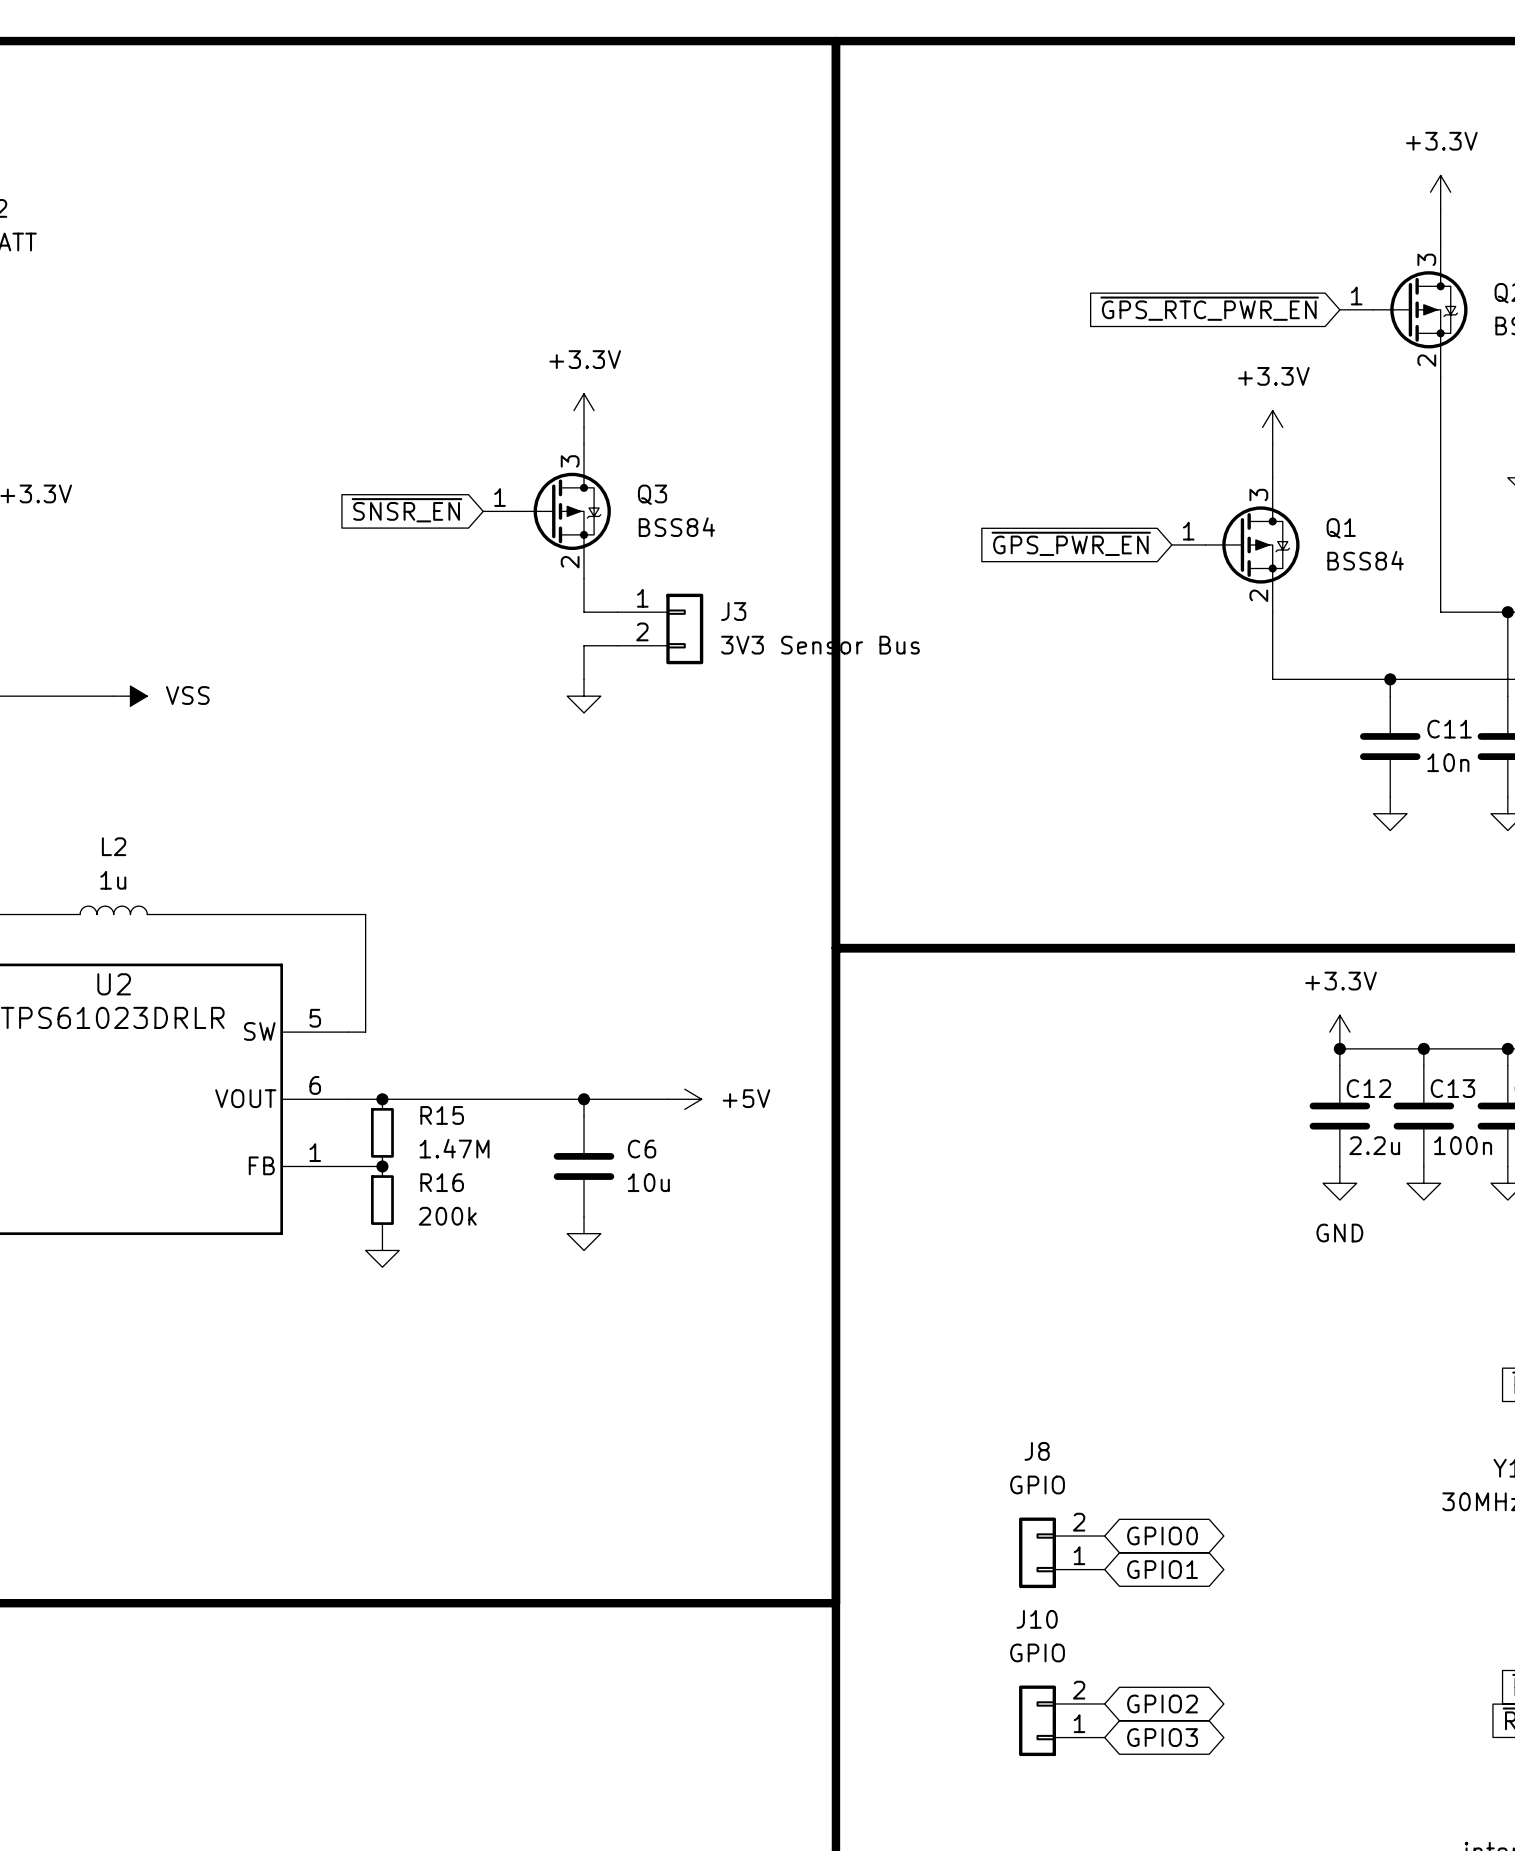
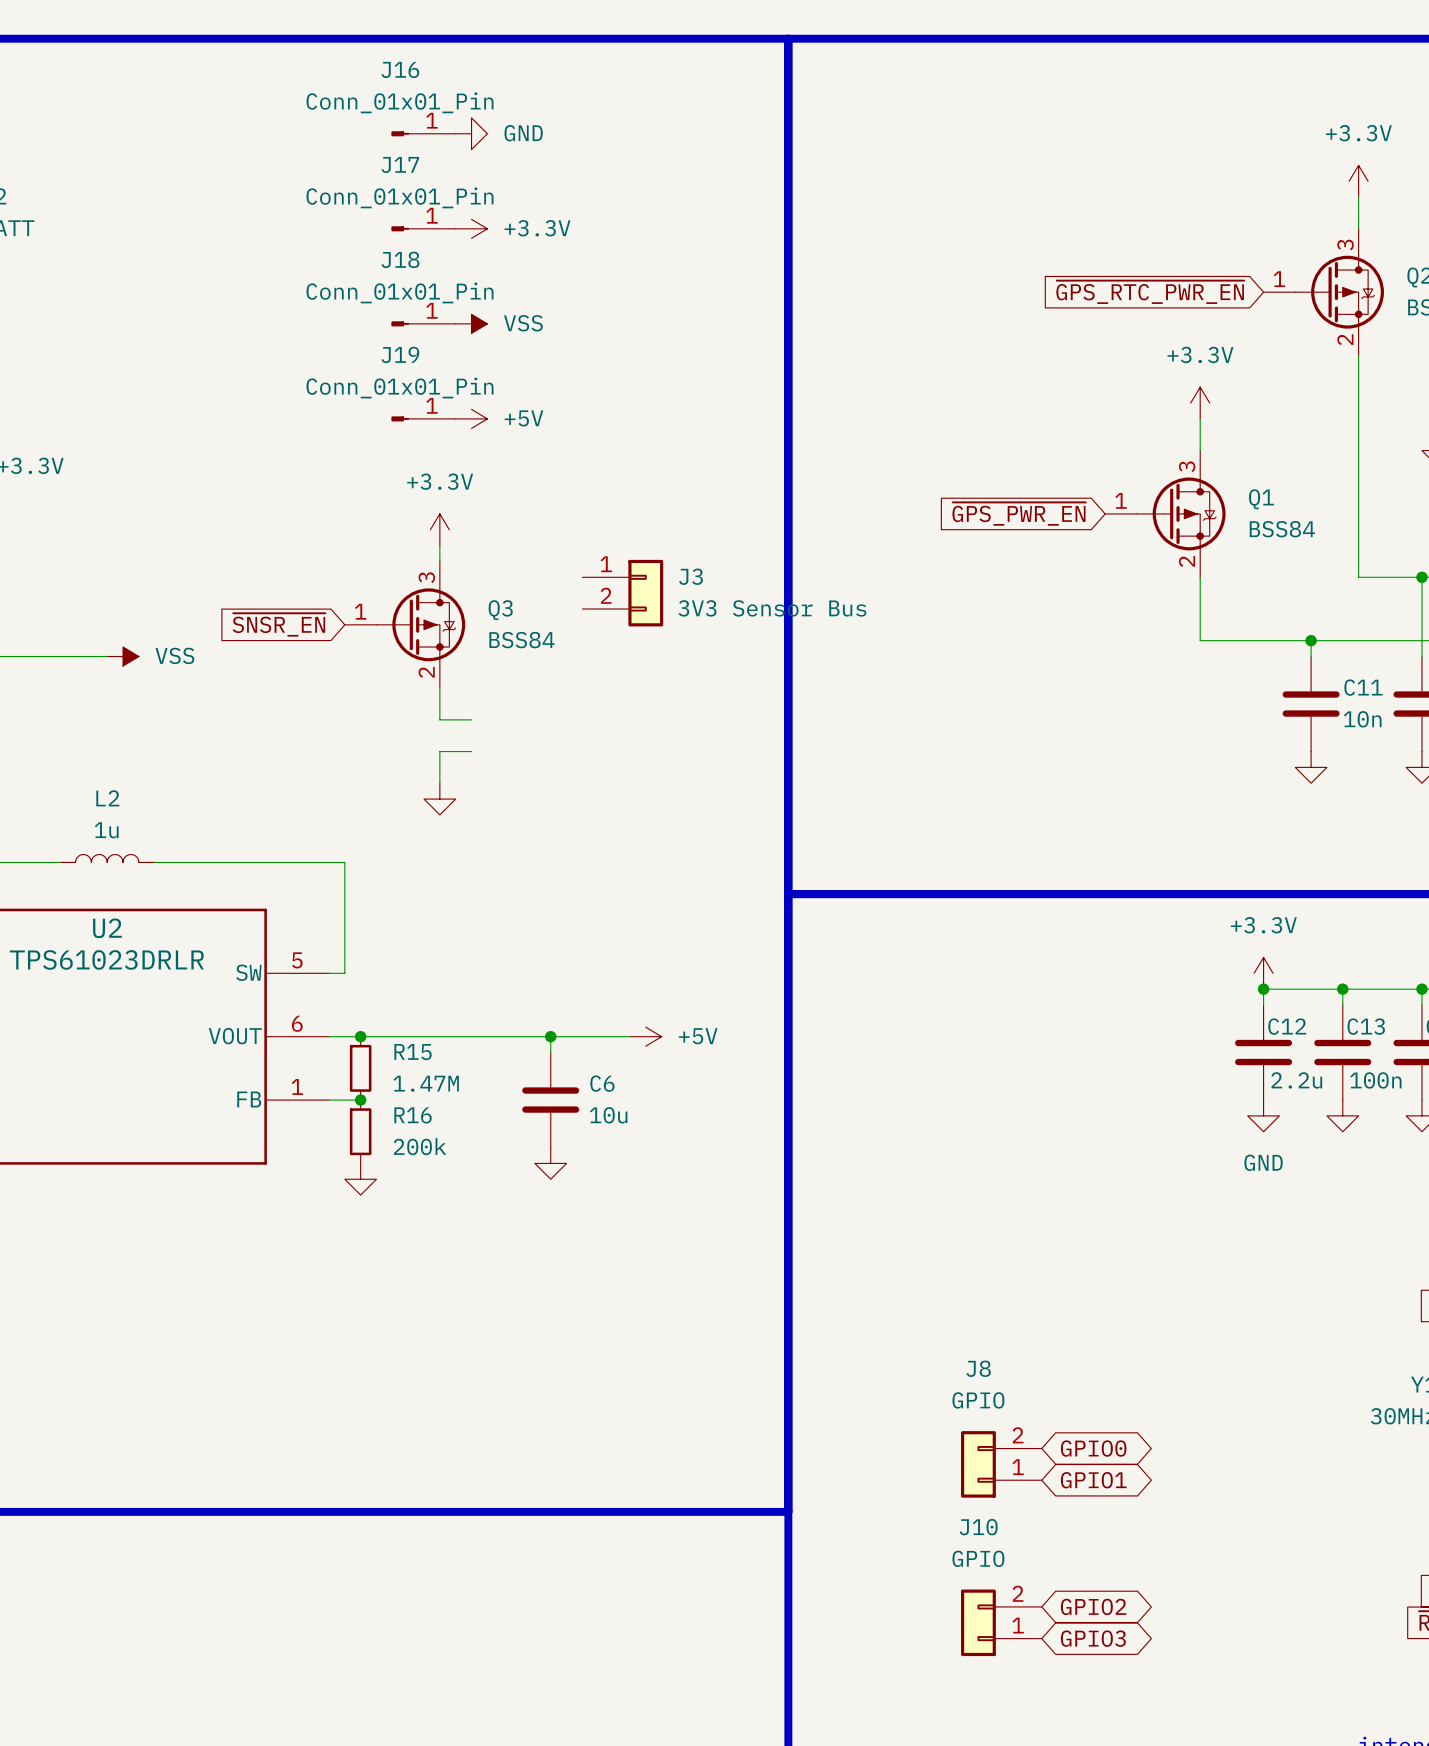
J16: none -> Conn_01x01_Pin (423, 133)
power symbol: none -> GND (471, 133)
J17: none -> Conn_01x01_Pin (423, 228)
power symbol: none -> +3.3V (471, 228)
J18: none -> Conn_01x01_Pin (423, 323)
power symbol: none -> VSS (471, 323)
power symbol: +3.3V (584, 410) -> none
wire: (584, 427) (584, 444) -> (439, 545) (439, 561)
J19: none -> Conn_01x01_Pin (423, 418)
power symbol: none -> +5V (471, 418)
global label position: ~{SNSR_EN} (407, 510) -> ~{SNSR_EN} (279, 624)
Q3 position: (547, 511) -> (405, 624)
power symbol: none -> +3.3V (439, 529)
wire: (584, 578) (584, 612) (617, 612) -> (439, 688) (439, 719) (471, 719)
wire: (617, 645) (584, 645) (584, 679) -> (471, 751) (439, 751) (439, 783)
power symbol position: (584, 696) -> (439, 799)

